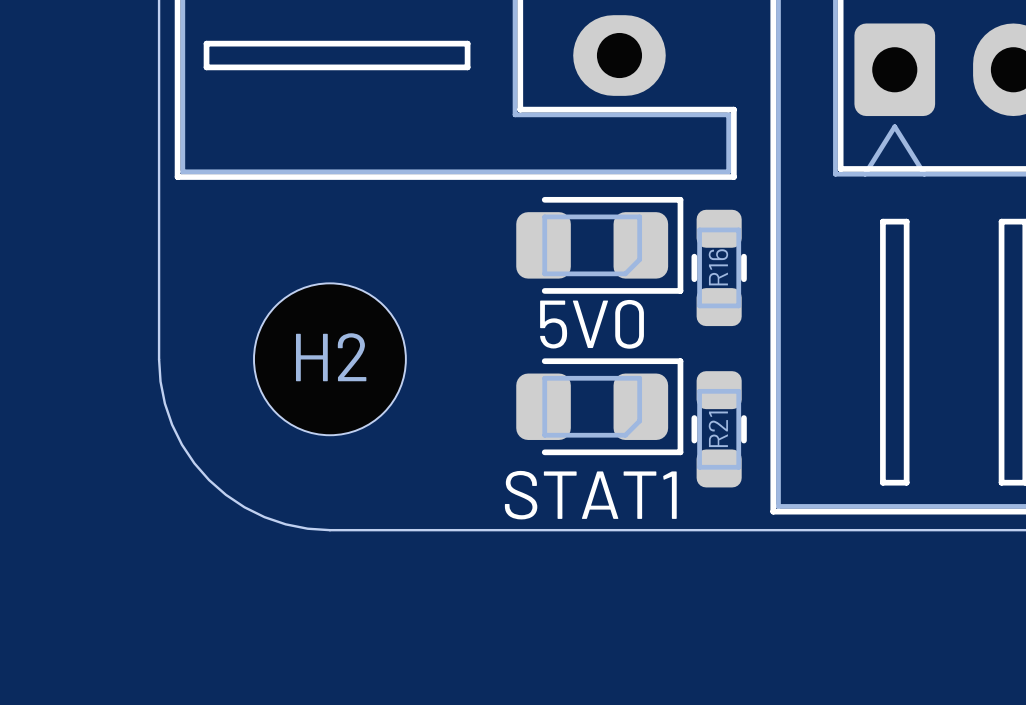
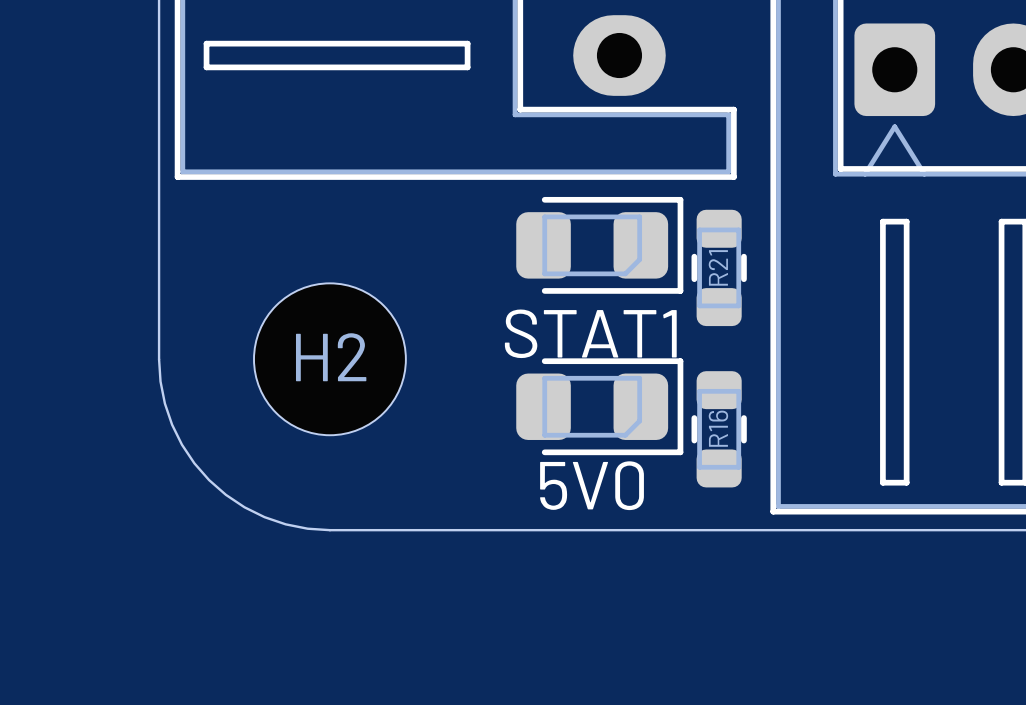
R16 name: R16 (718, 267) -> R21 (718, 267)
5V0 name: 5V0 (592, 324) -> STAT1 (590, 333)
R21 name: R21 (718, 429) -> R16 (718, 428)
STAT1 name: STAT1 (590, 495) -> 5V0 (592, 485)

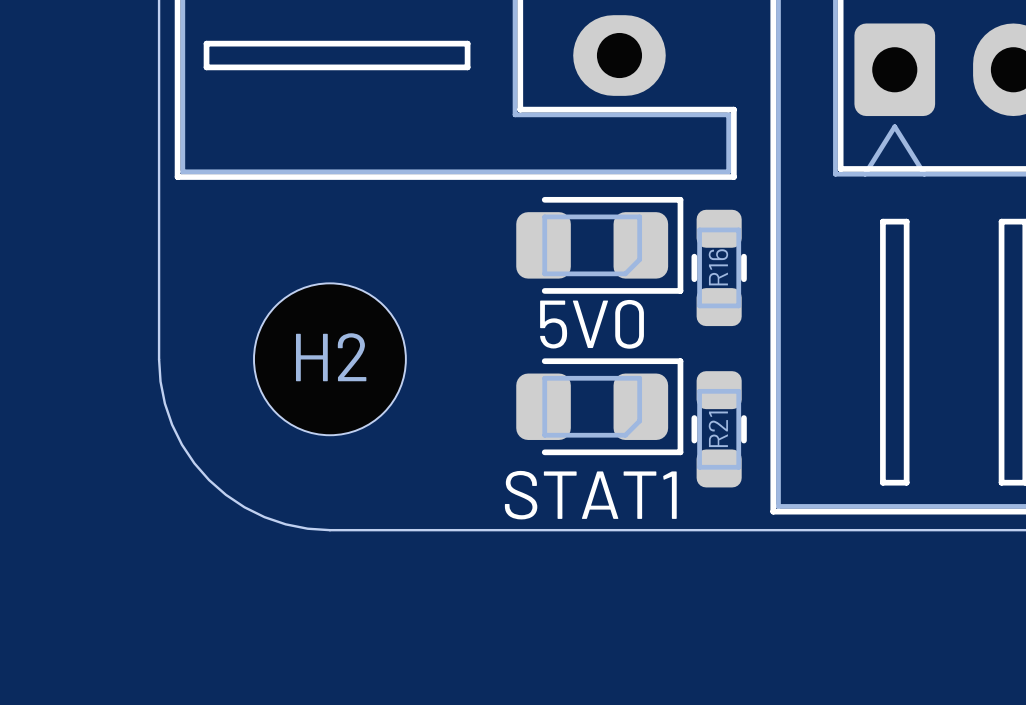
R21 name: R21 (718, 267) -> R16 (718, 267)
STAT1 name: STAT1 (590, 333) -> 5V0 (592, 324)
R16 name: R16 (718, 428) -> R21 (718, 429)
5V0 name: 5V0 (592, 485) -> STAT1 (590, 495)

